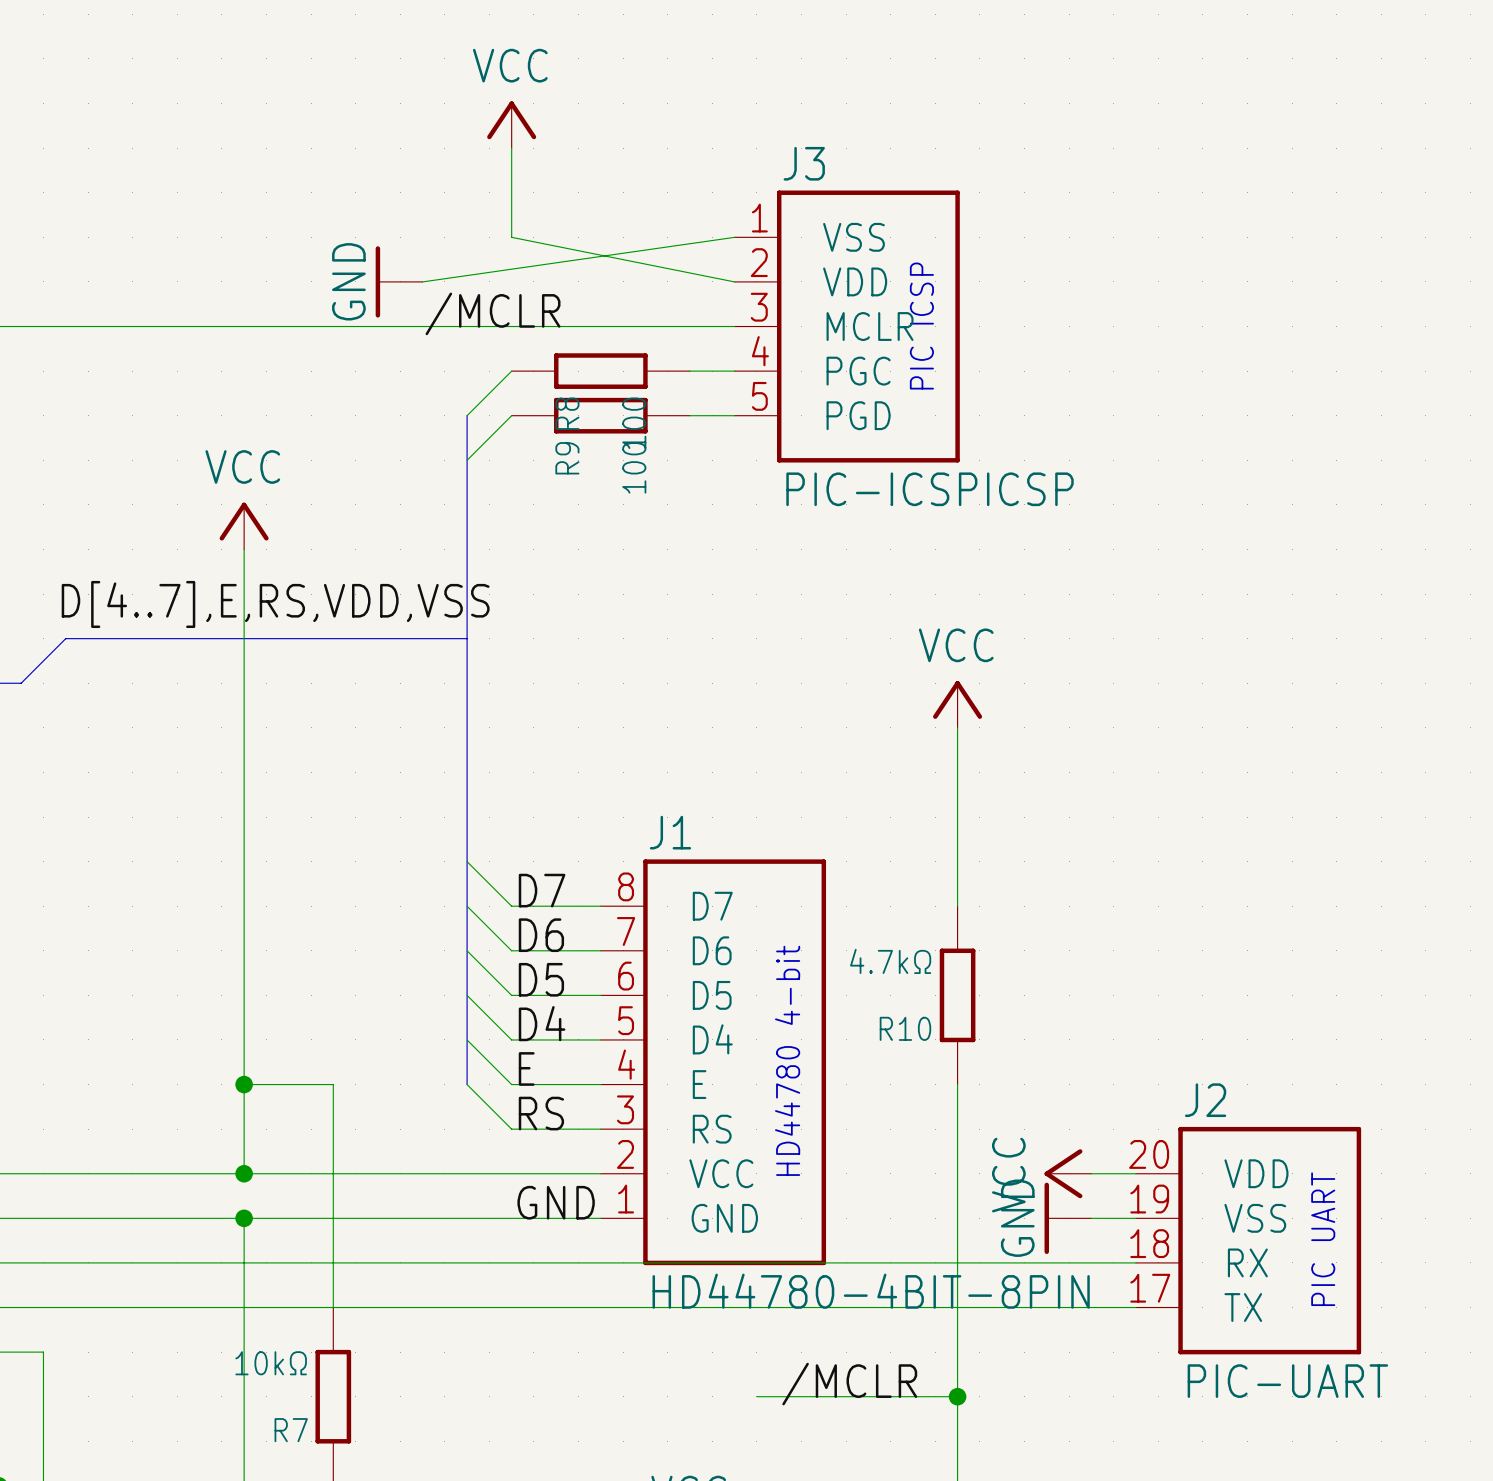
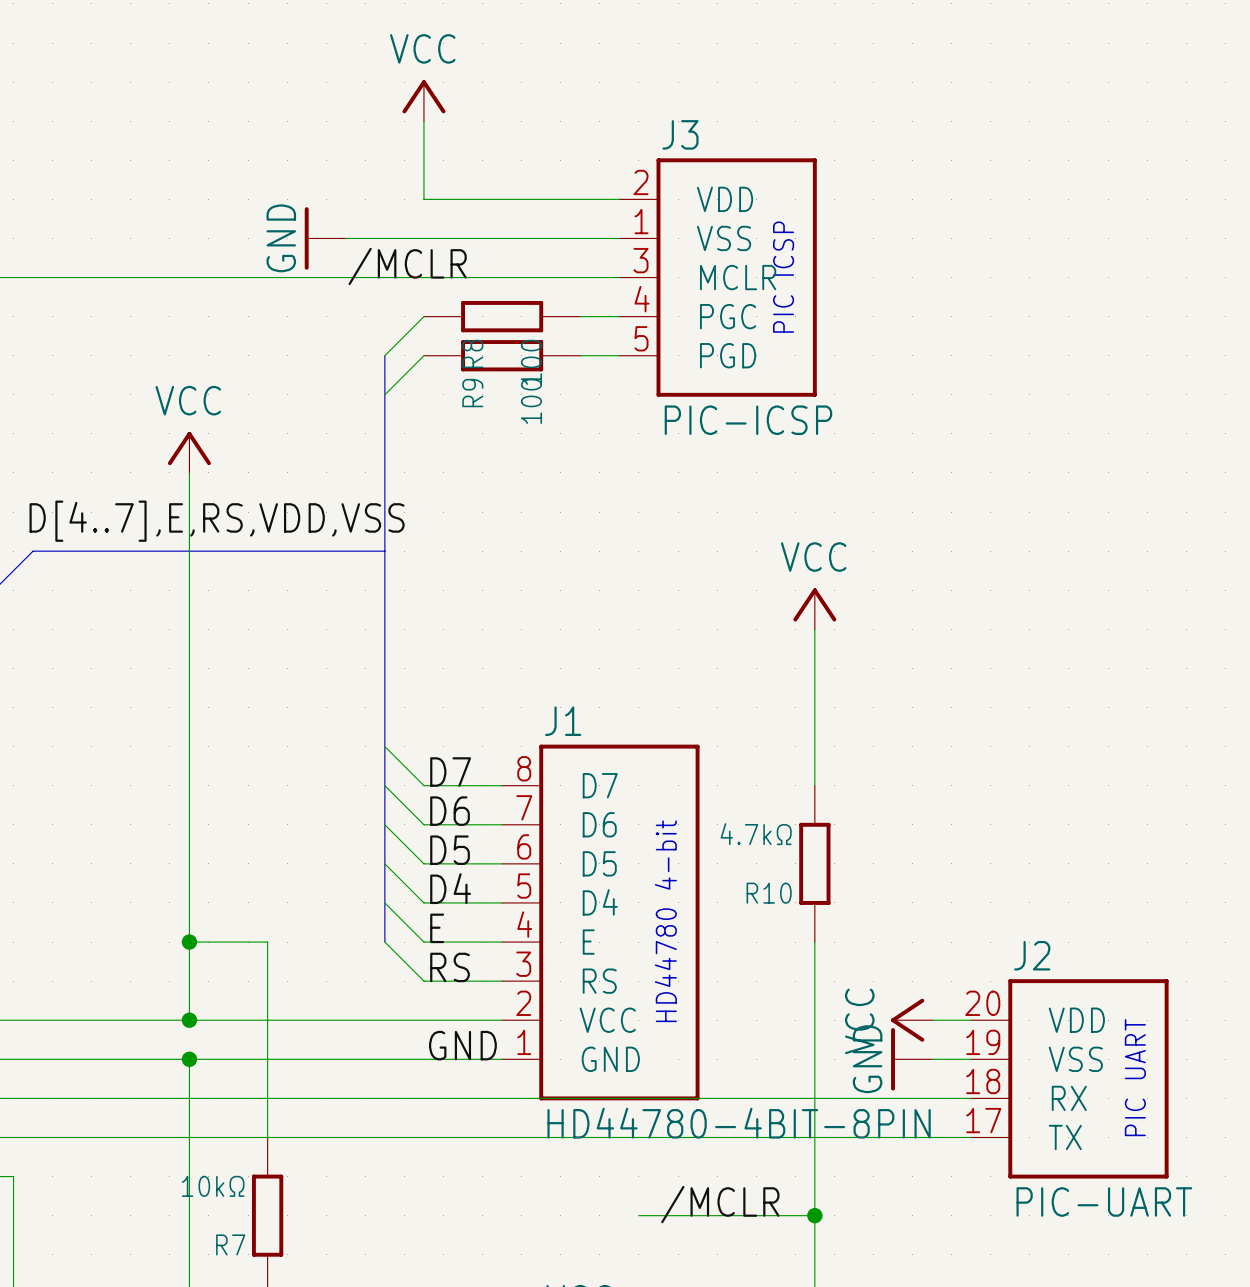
J3 pin number: 1 (759, 218) -> 2 (641, 182)
wire: (511, 237) (734, 281) -> (423, 199) (619, 199)
wire: (734, 237) (422, 281) -> (619, 238) (345, 238)
J3 pin name: VSS (853, 237) -> VDD (725, 199)
J3 pin number: 2 (759, 262) -> 1 (641, 221)
J3 pin name: VDD (855, 281) -> VSS (724, 238)
J3 value: PIC-ICSPICSP (930, 489) -> PIC-ICSP (748, 420)

